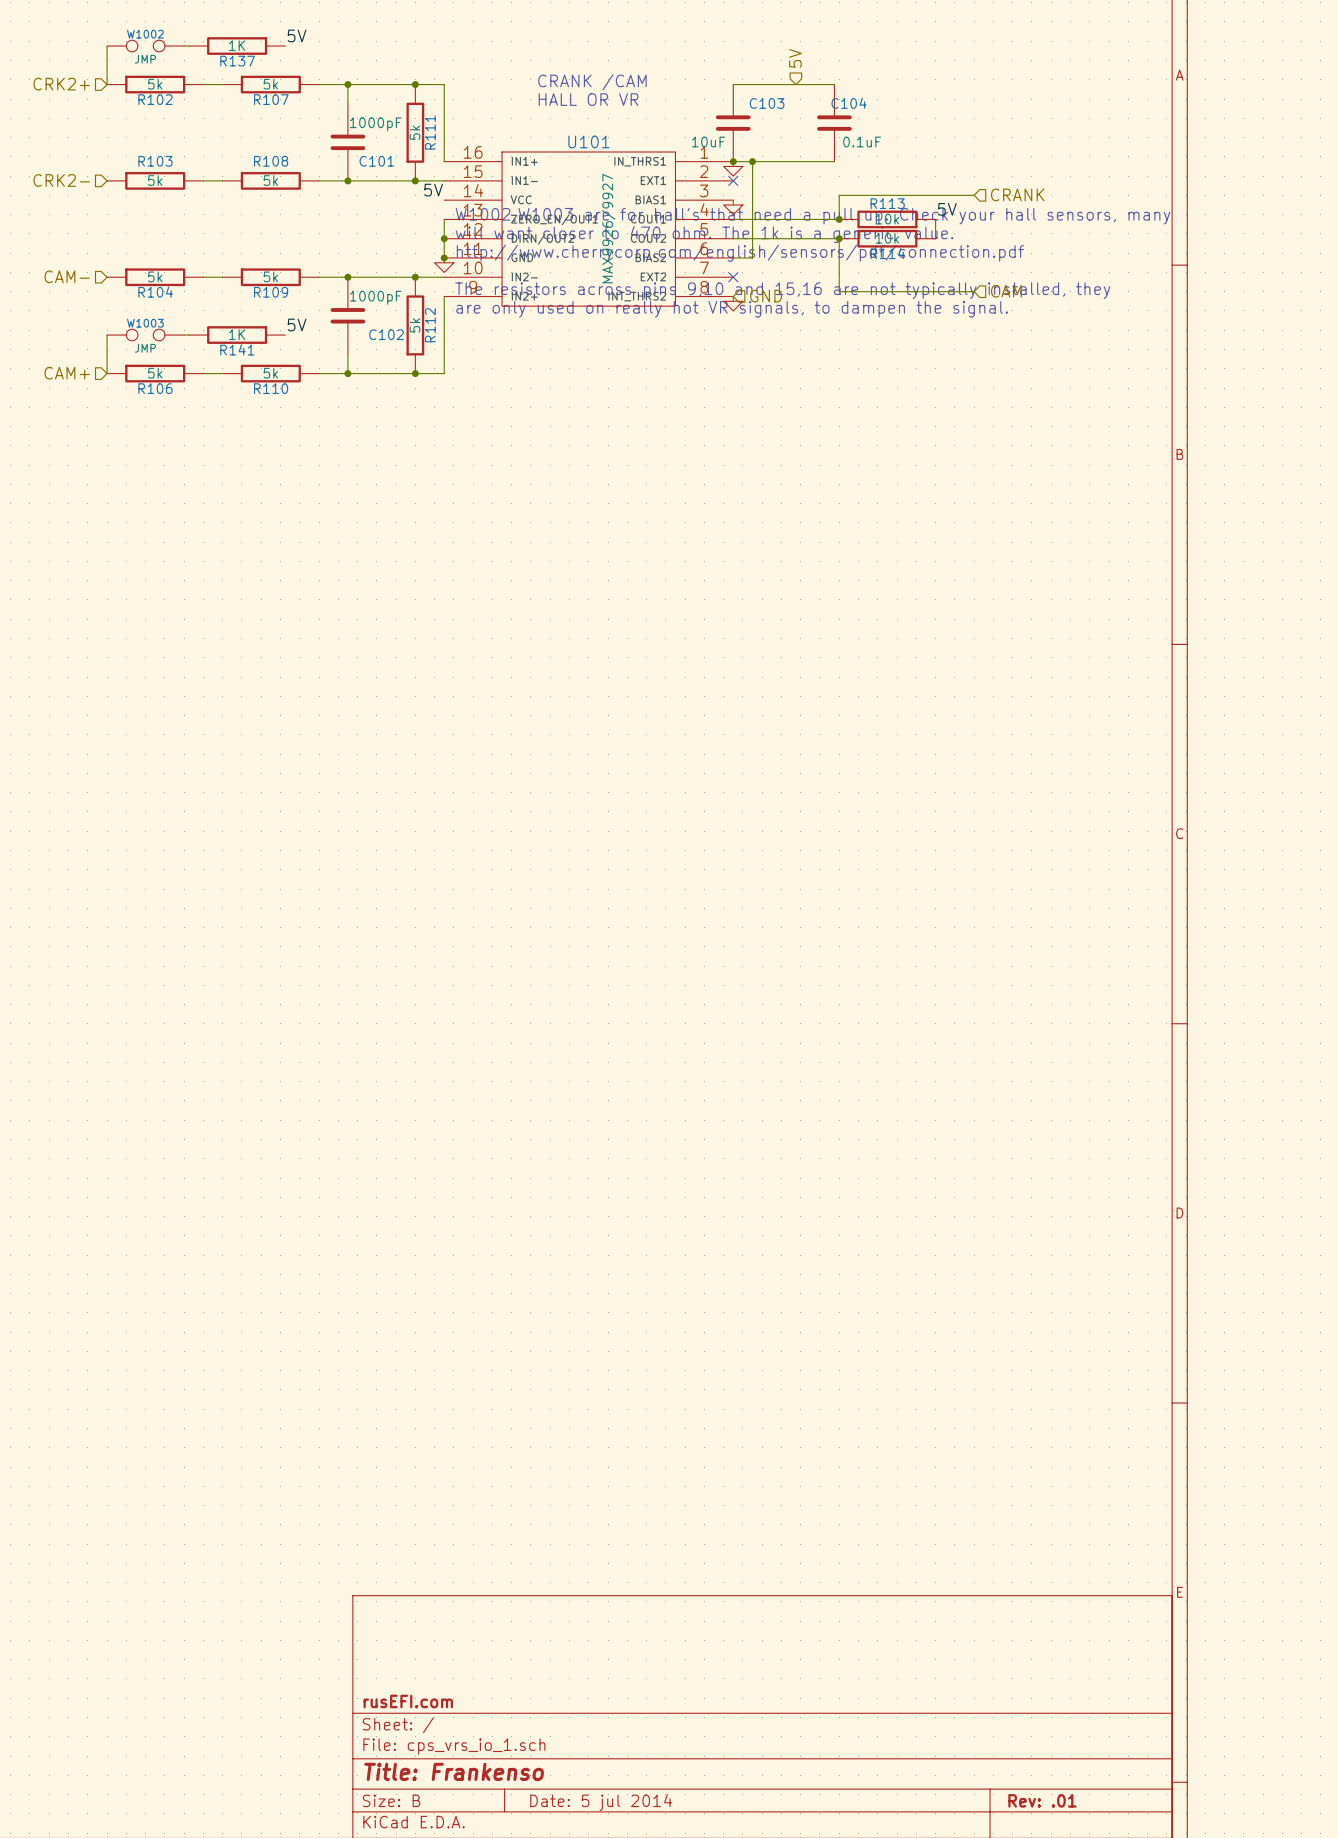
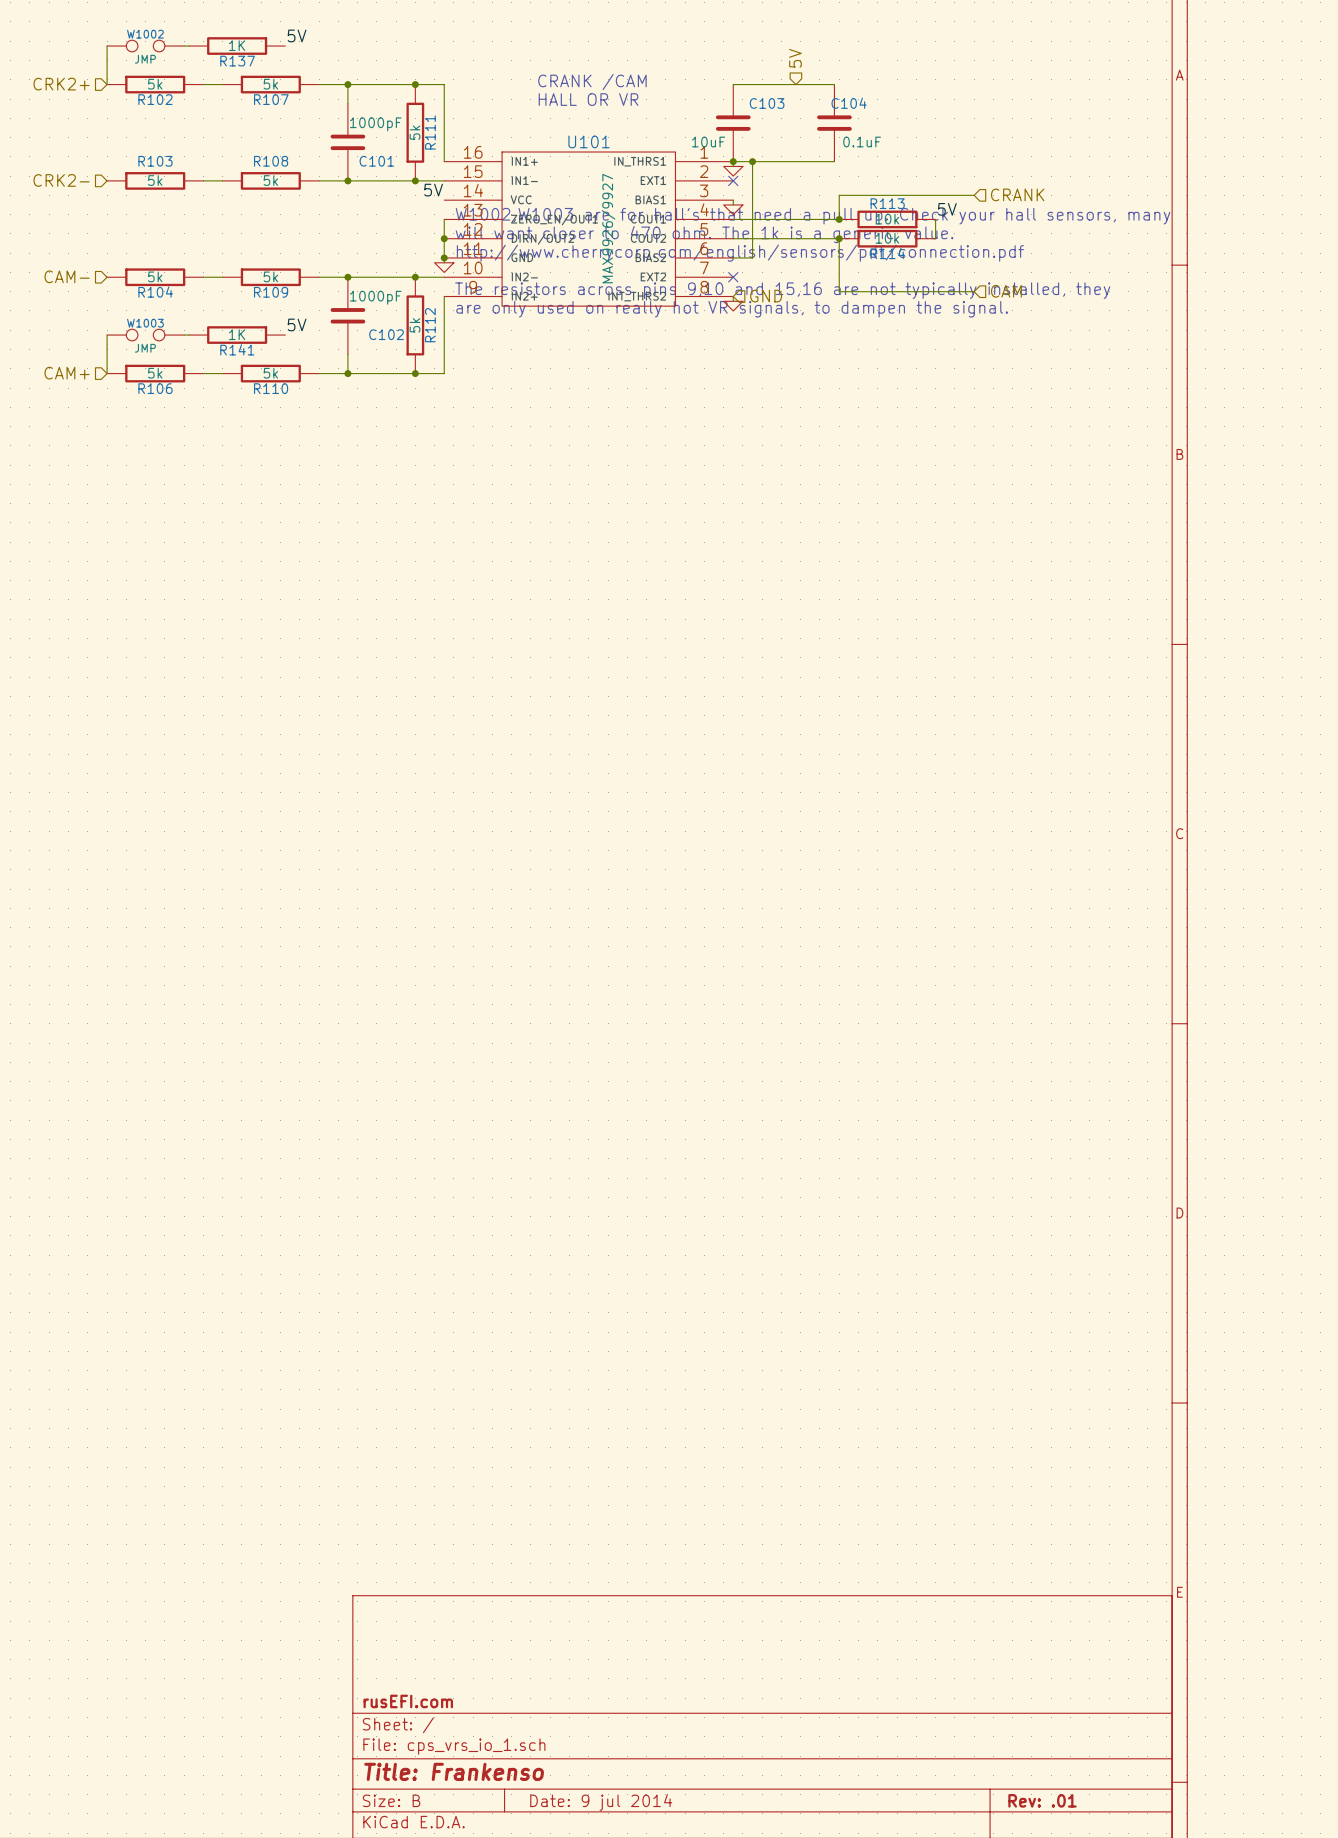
title block: Date: 5 jul 2014 (601, 1802) -> Date: 9 jul 2014 (601, 1802)

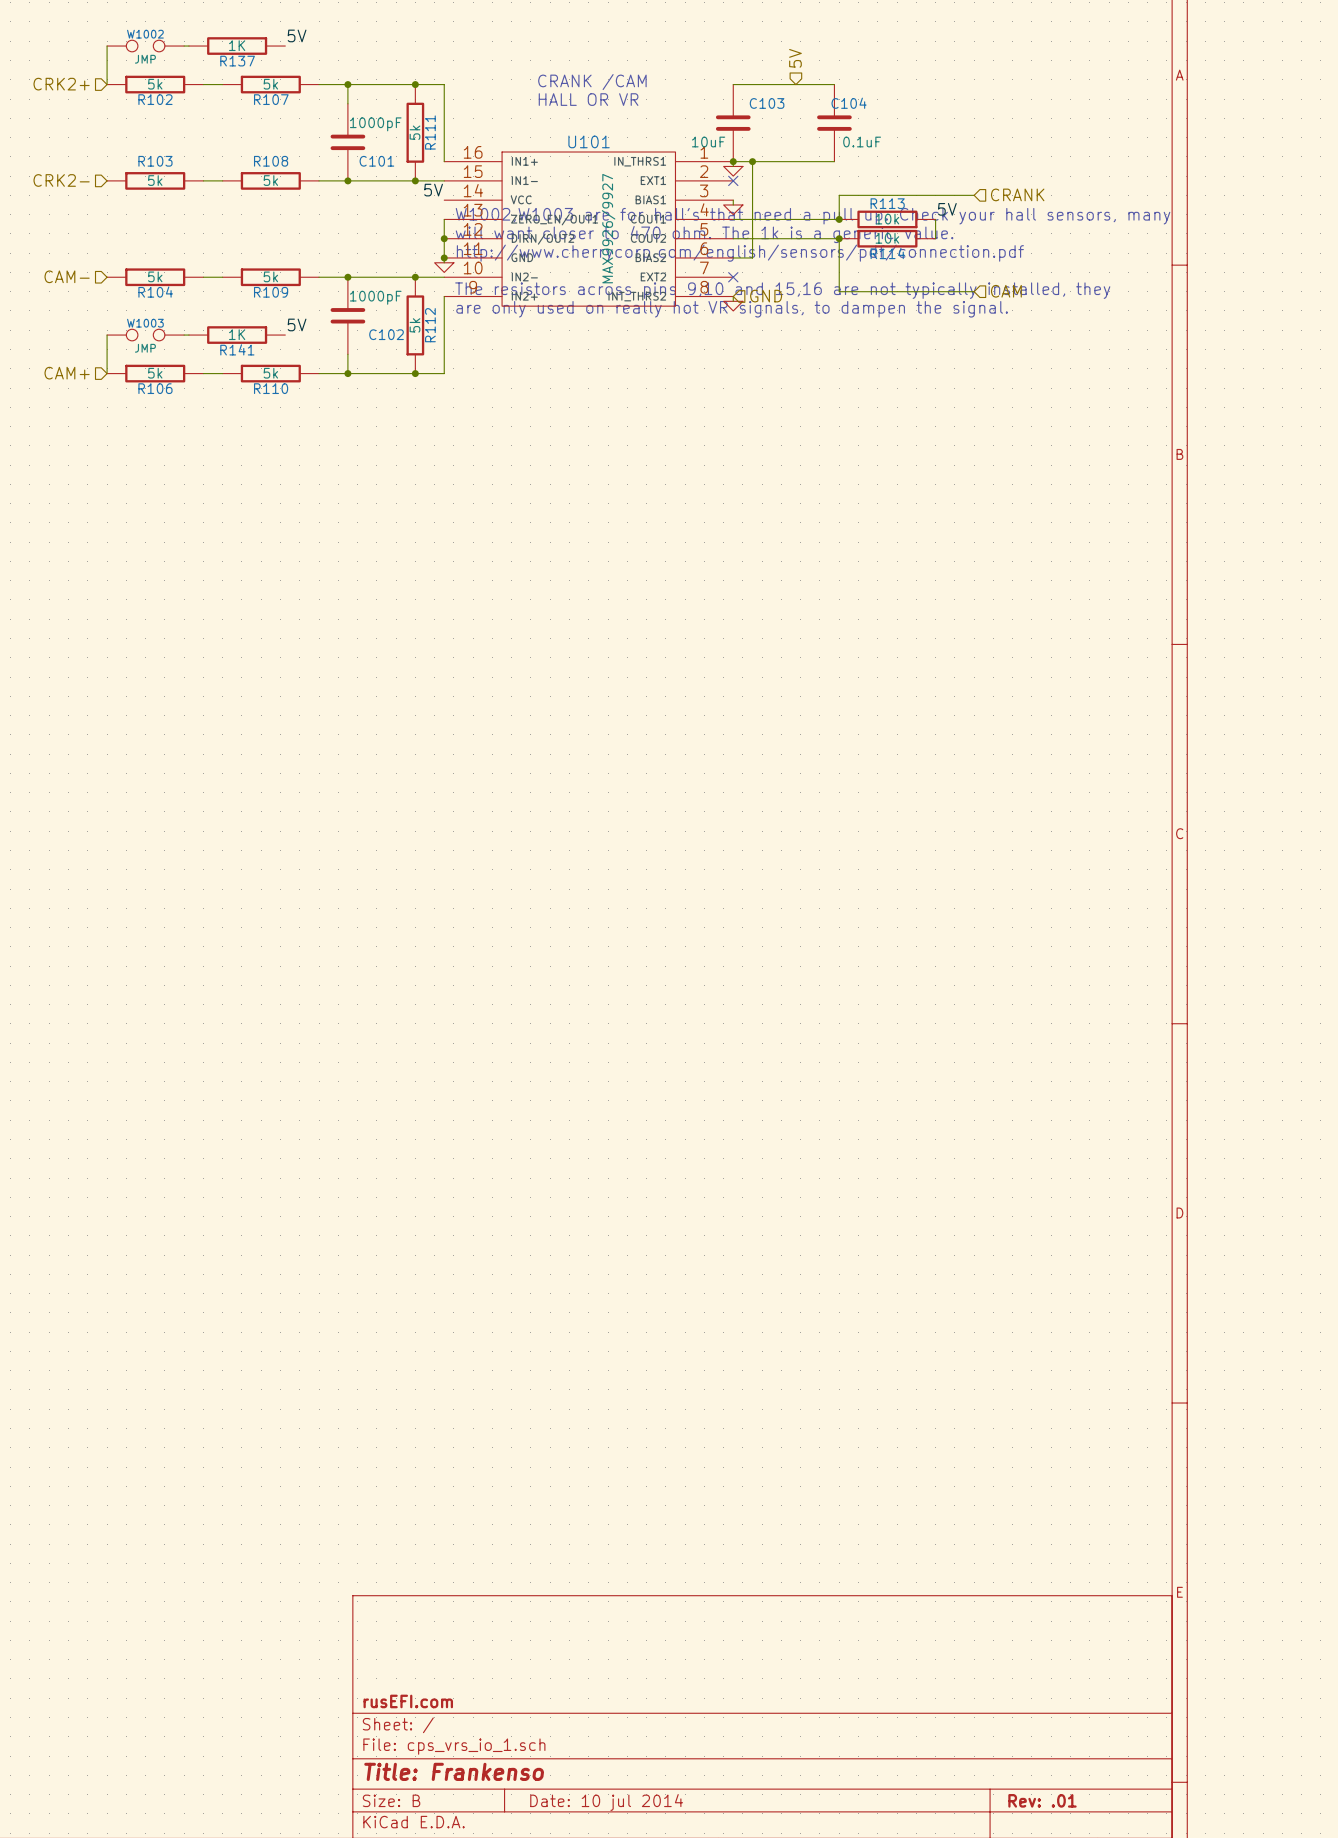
title block: Date: 9 jul 2014 (601, 1802) -> Date: 10 jul 2014 (606, 1802)

